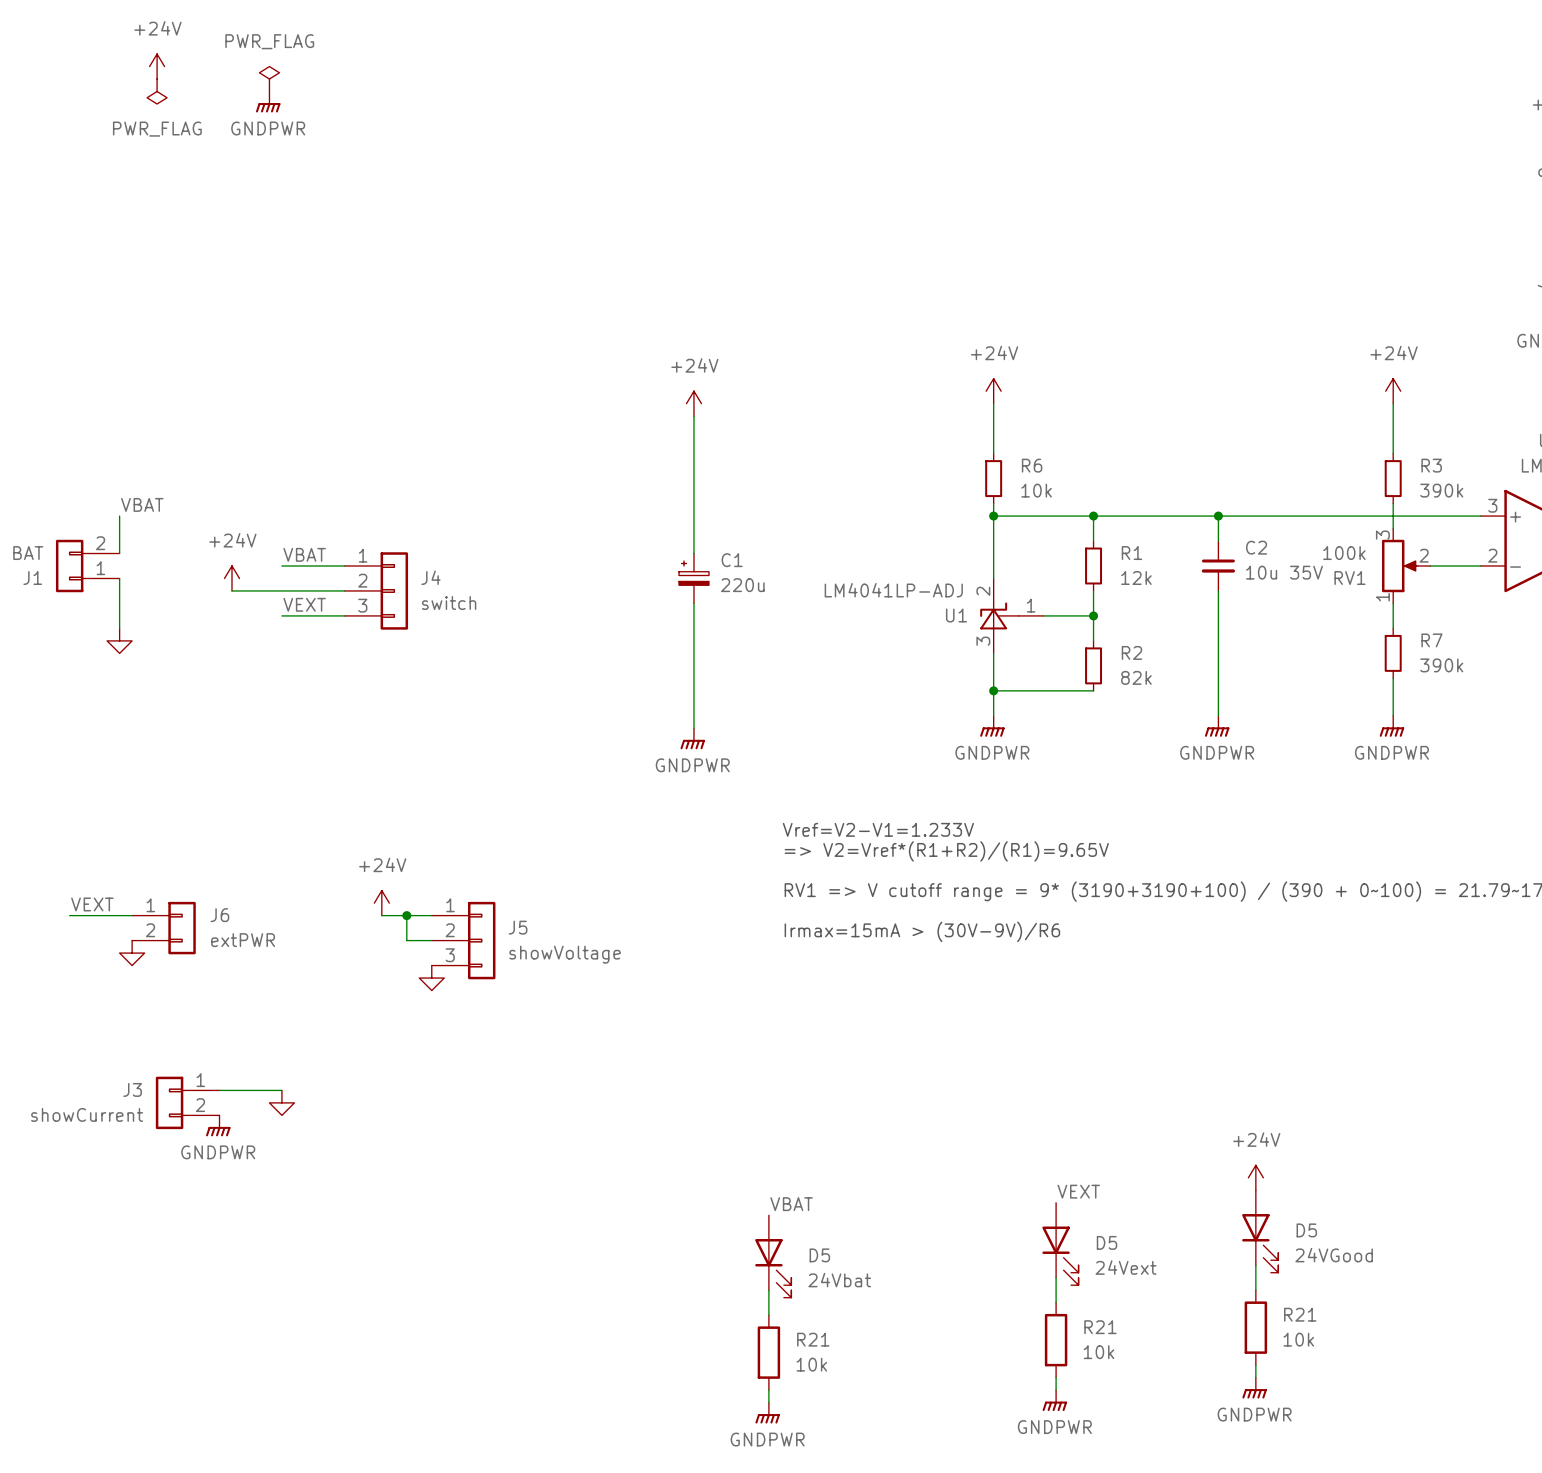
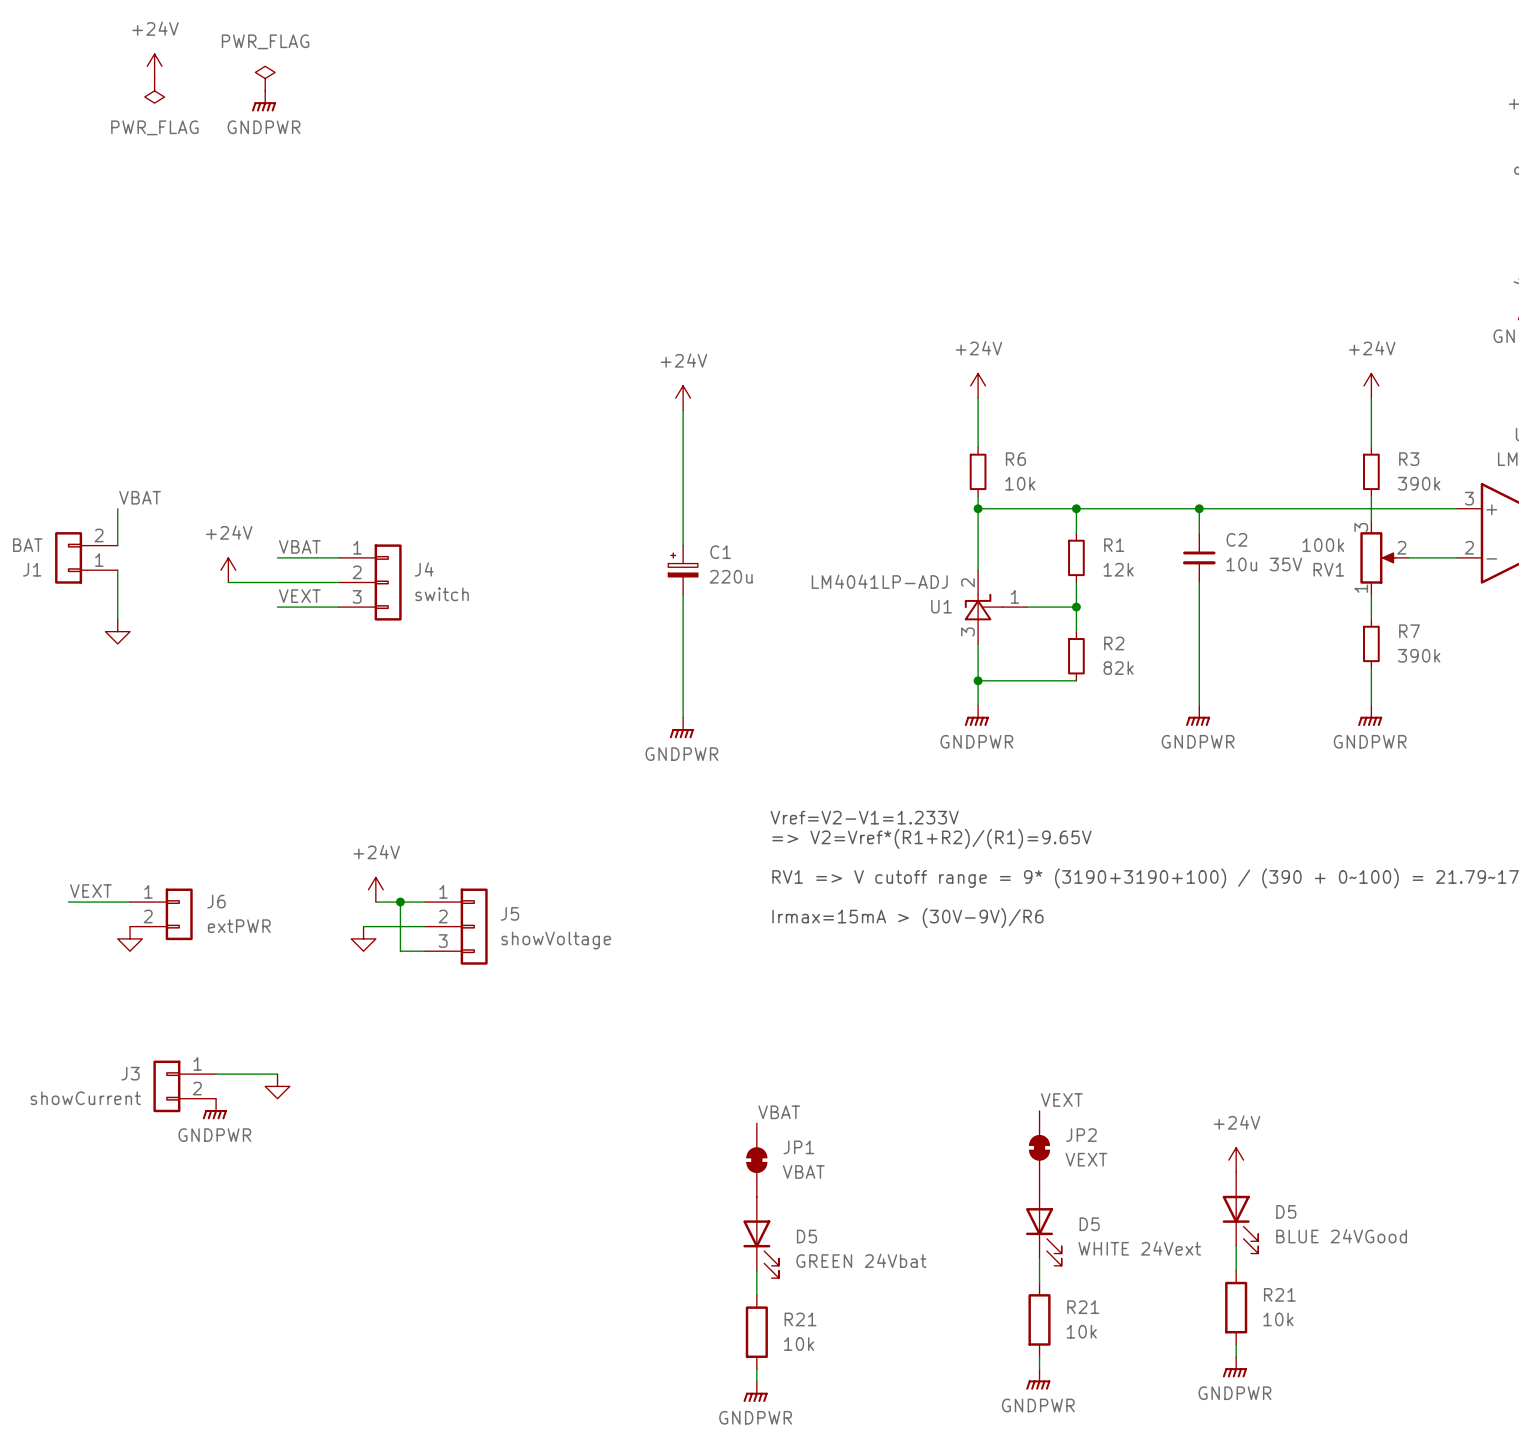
wire: none -> (363, 926) (400, 926) (400, 951) (425, 951)
power symbol position: (431, 978) -> (363, 938)
JP2: none -> VEXT (1039, 1147)
JP1: none -> VBAT (756, 1160)
label position: VEXT (1078, 1191) -> VEXT (1061, 1100)
label position: VBAT (791, 1204) -> VBAT (779, 1112)
D5 value: 24VGood (1334, 1255) -> BLUE 24VGood (1341, 1236)
D5 value: 24Vext (1126, 1267) -> WHITE 24Vext (1139, 1248)
D5 value: 24Vbat (839, 1280) -> GREEN 24Vbat (861, 1260)

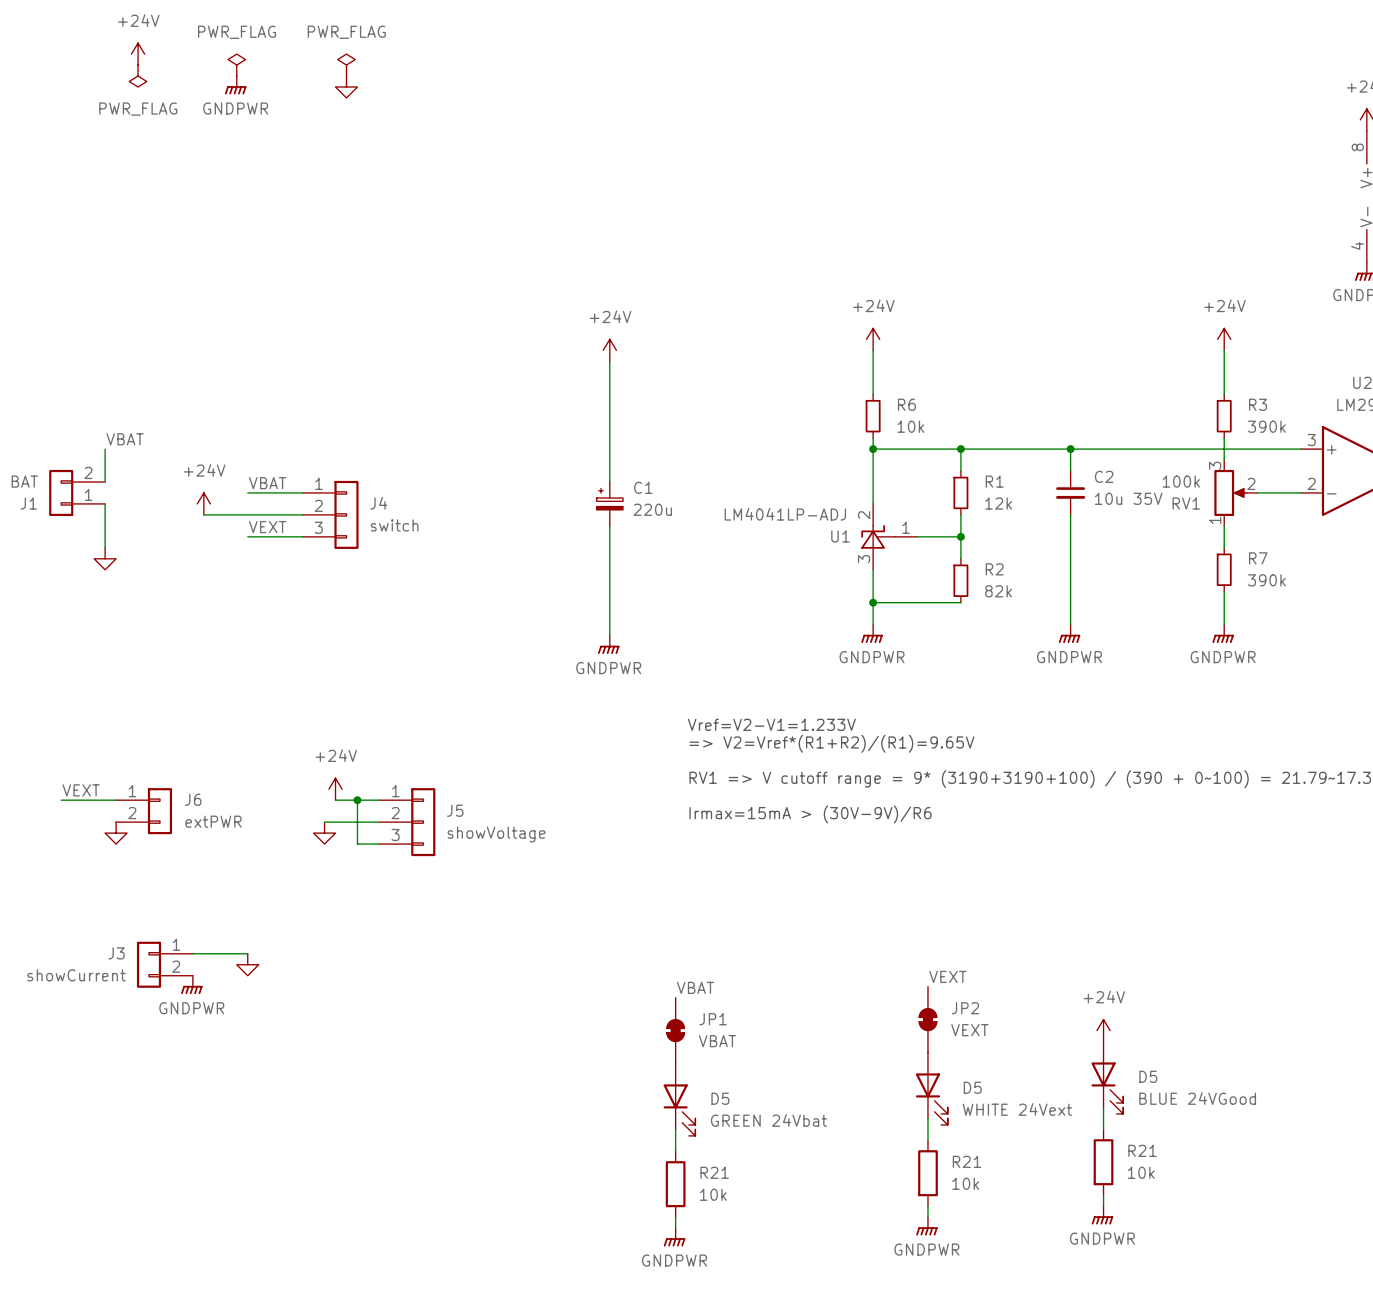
power symbol: none -> PWR_FLAG (346, 65)
power symbol: none -> (346, 87)

